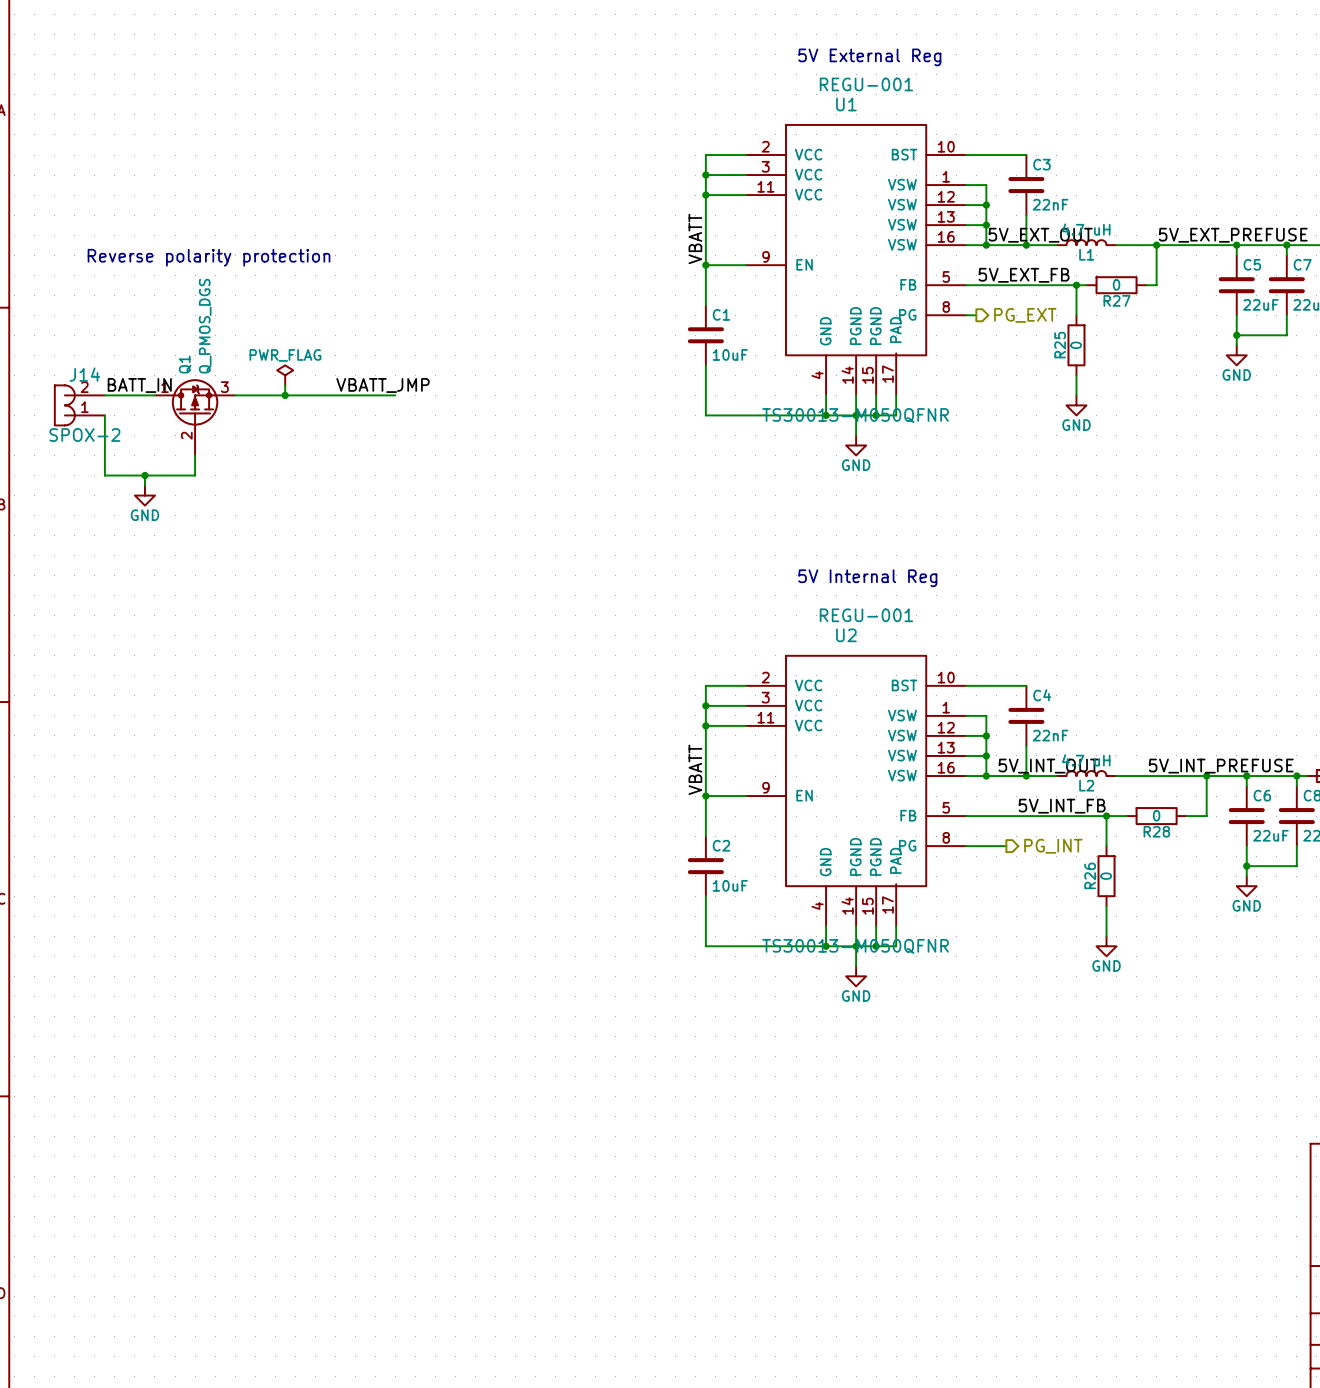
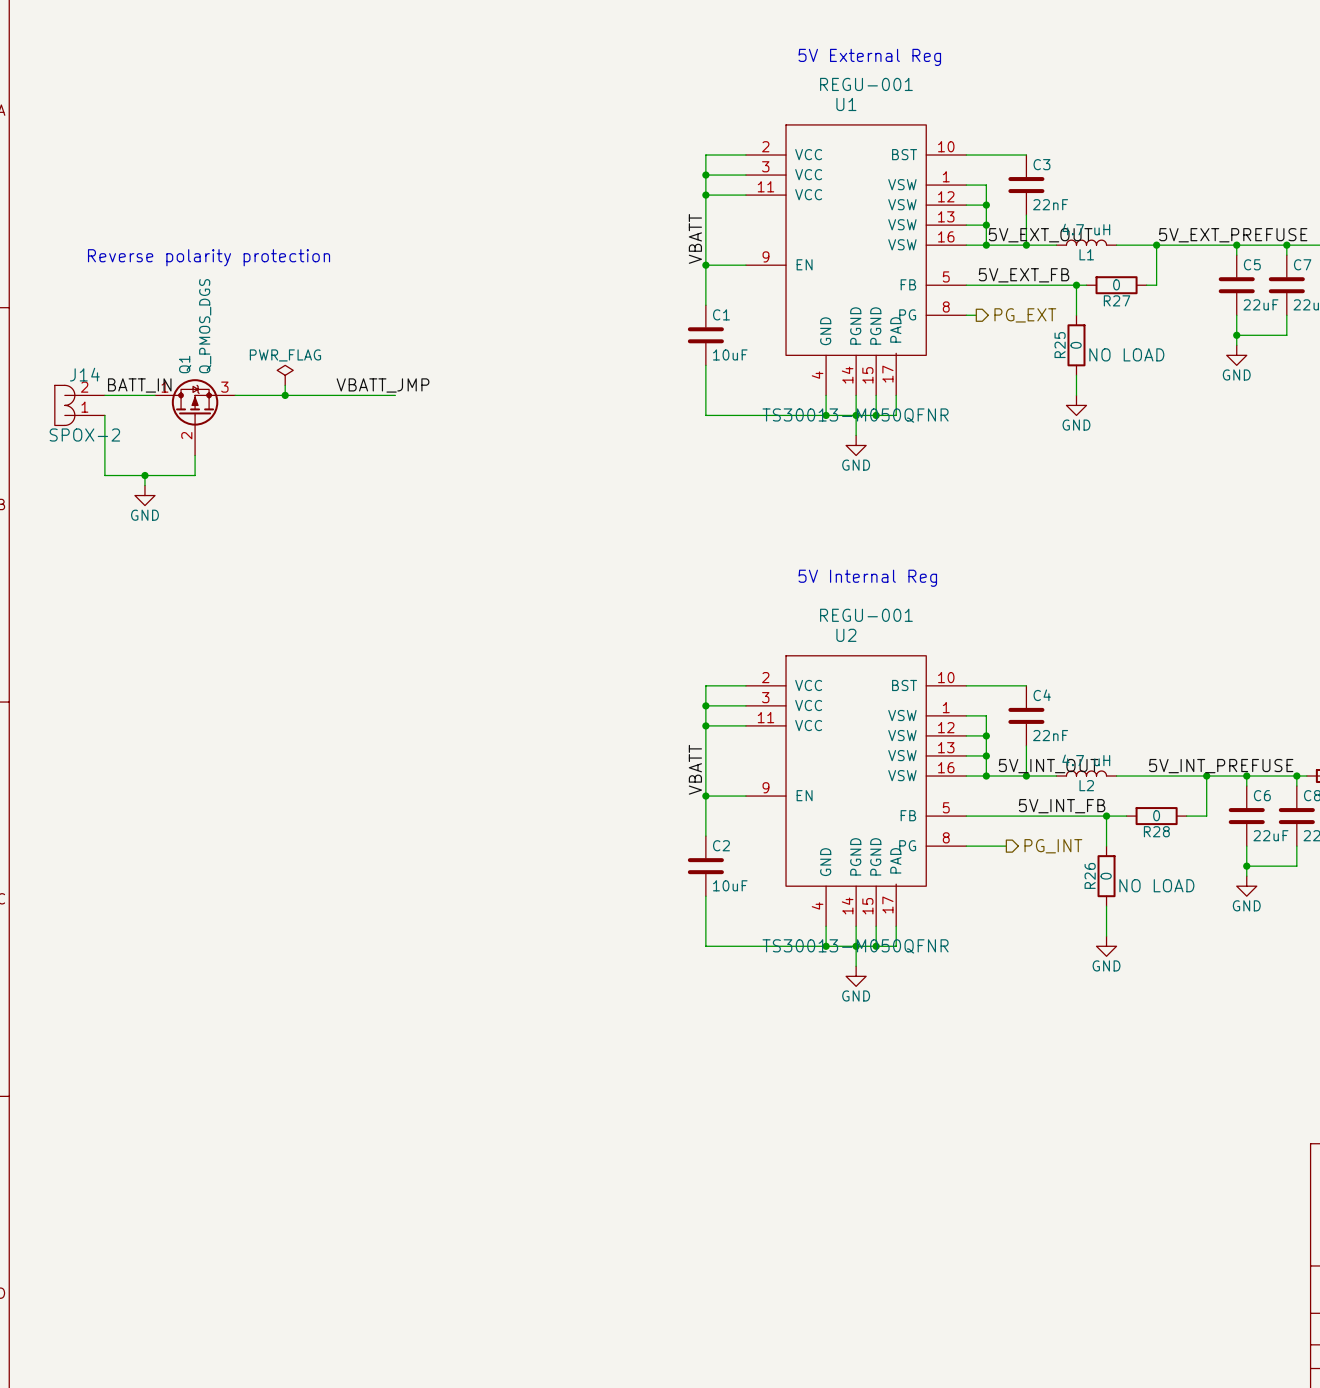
R25 text: none -> NO LOAD (1126, 354)
R26 text: none -> NO LOAD (1156, 885)

